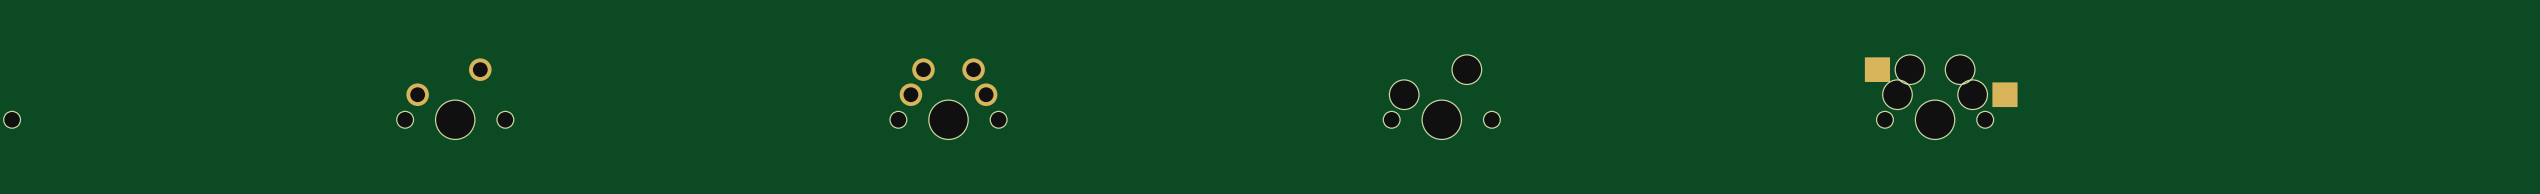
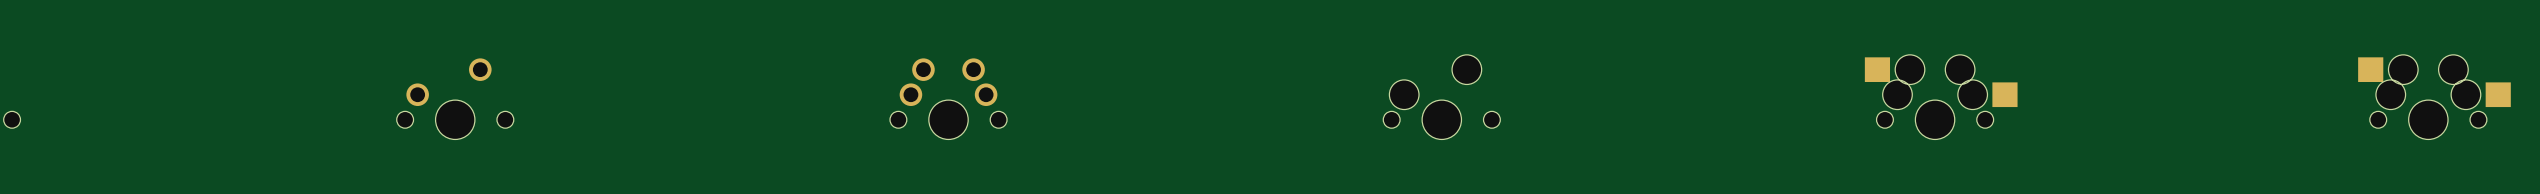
part: none -> (2434, 97)

